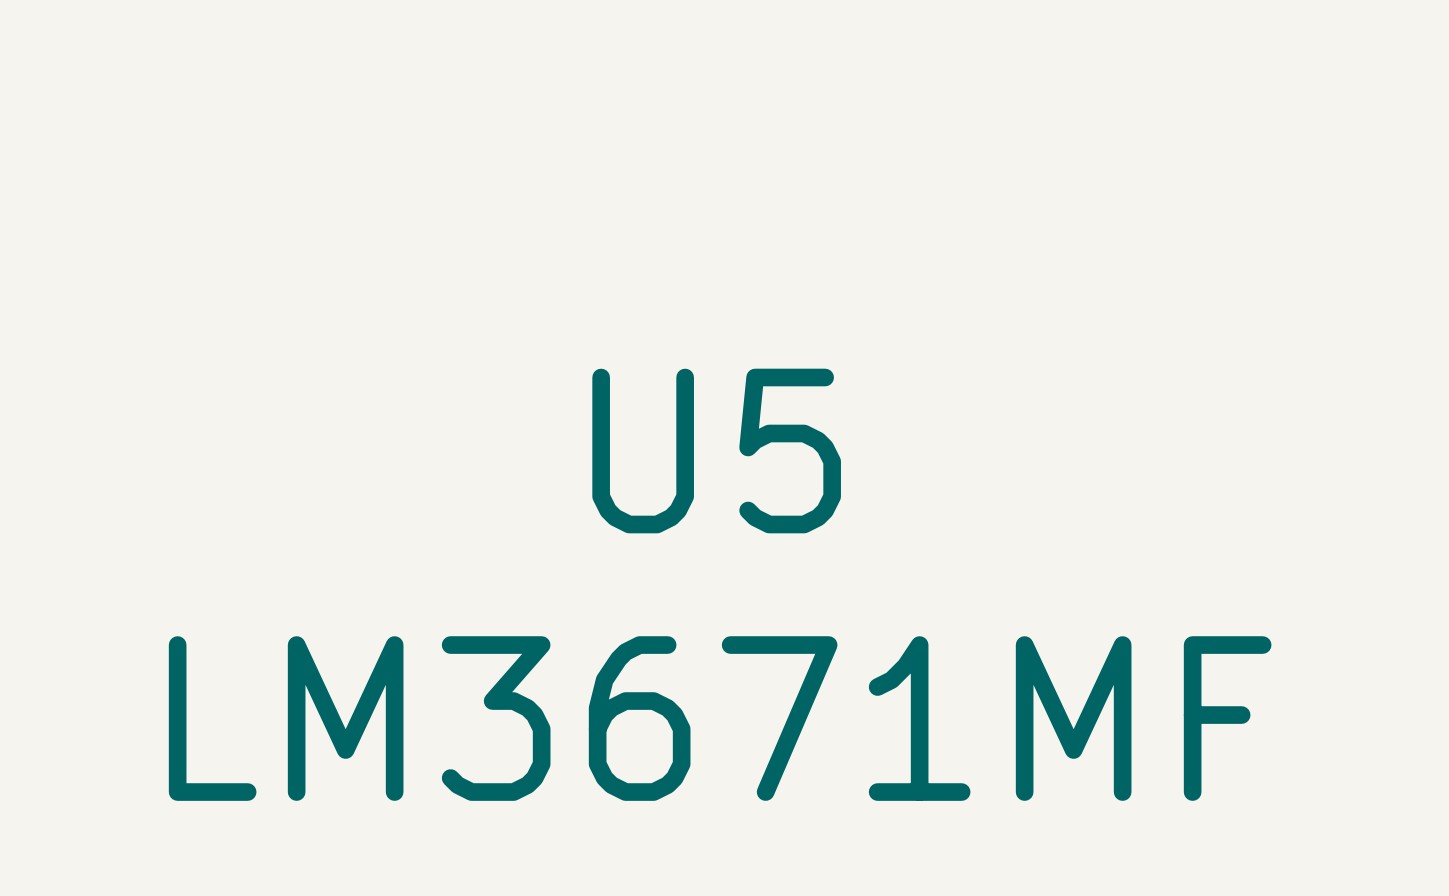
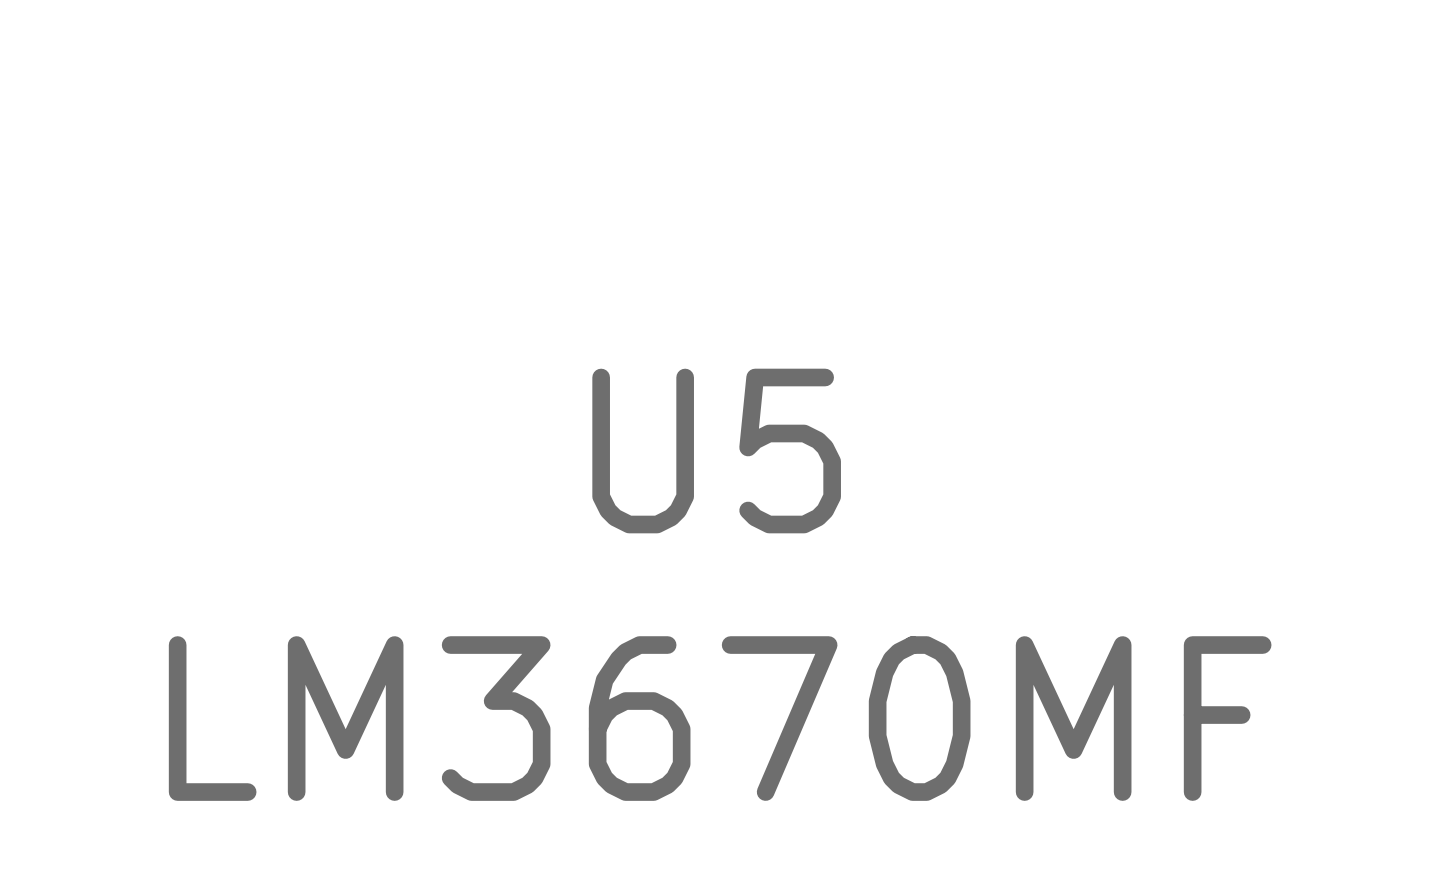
U5 value: LM3671MF (720, 718) -> LM3670MF (720, 718)

